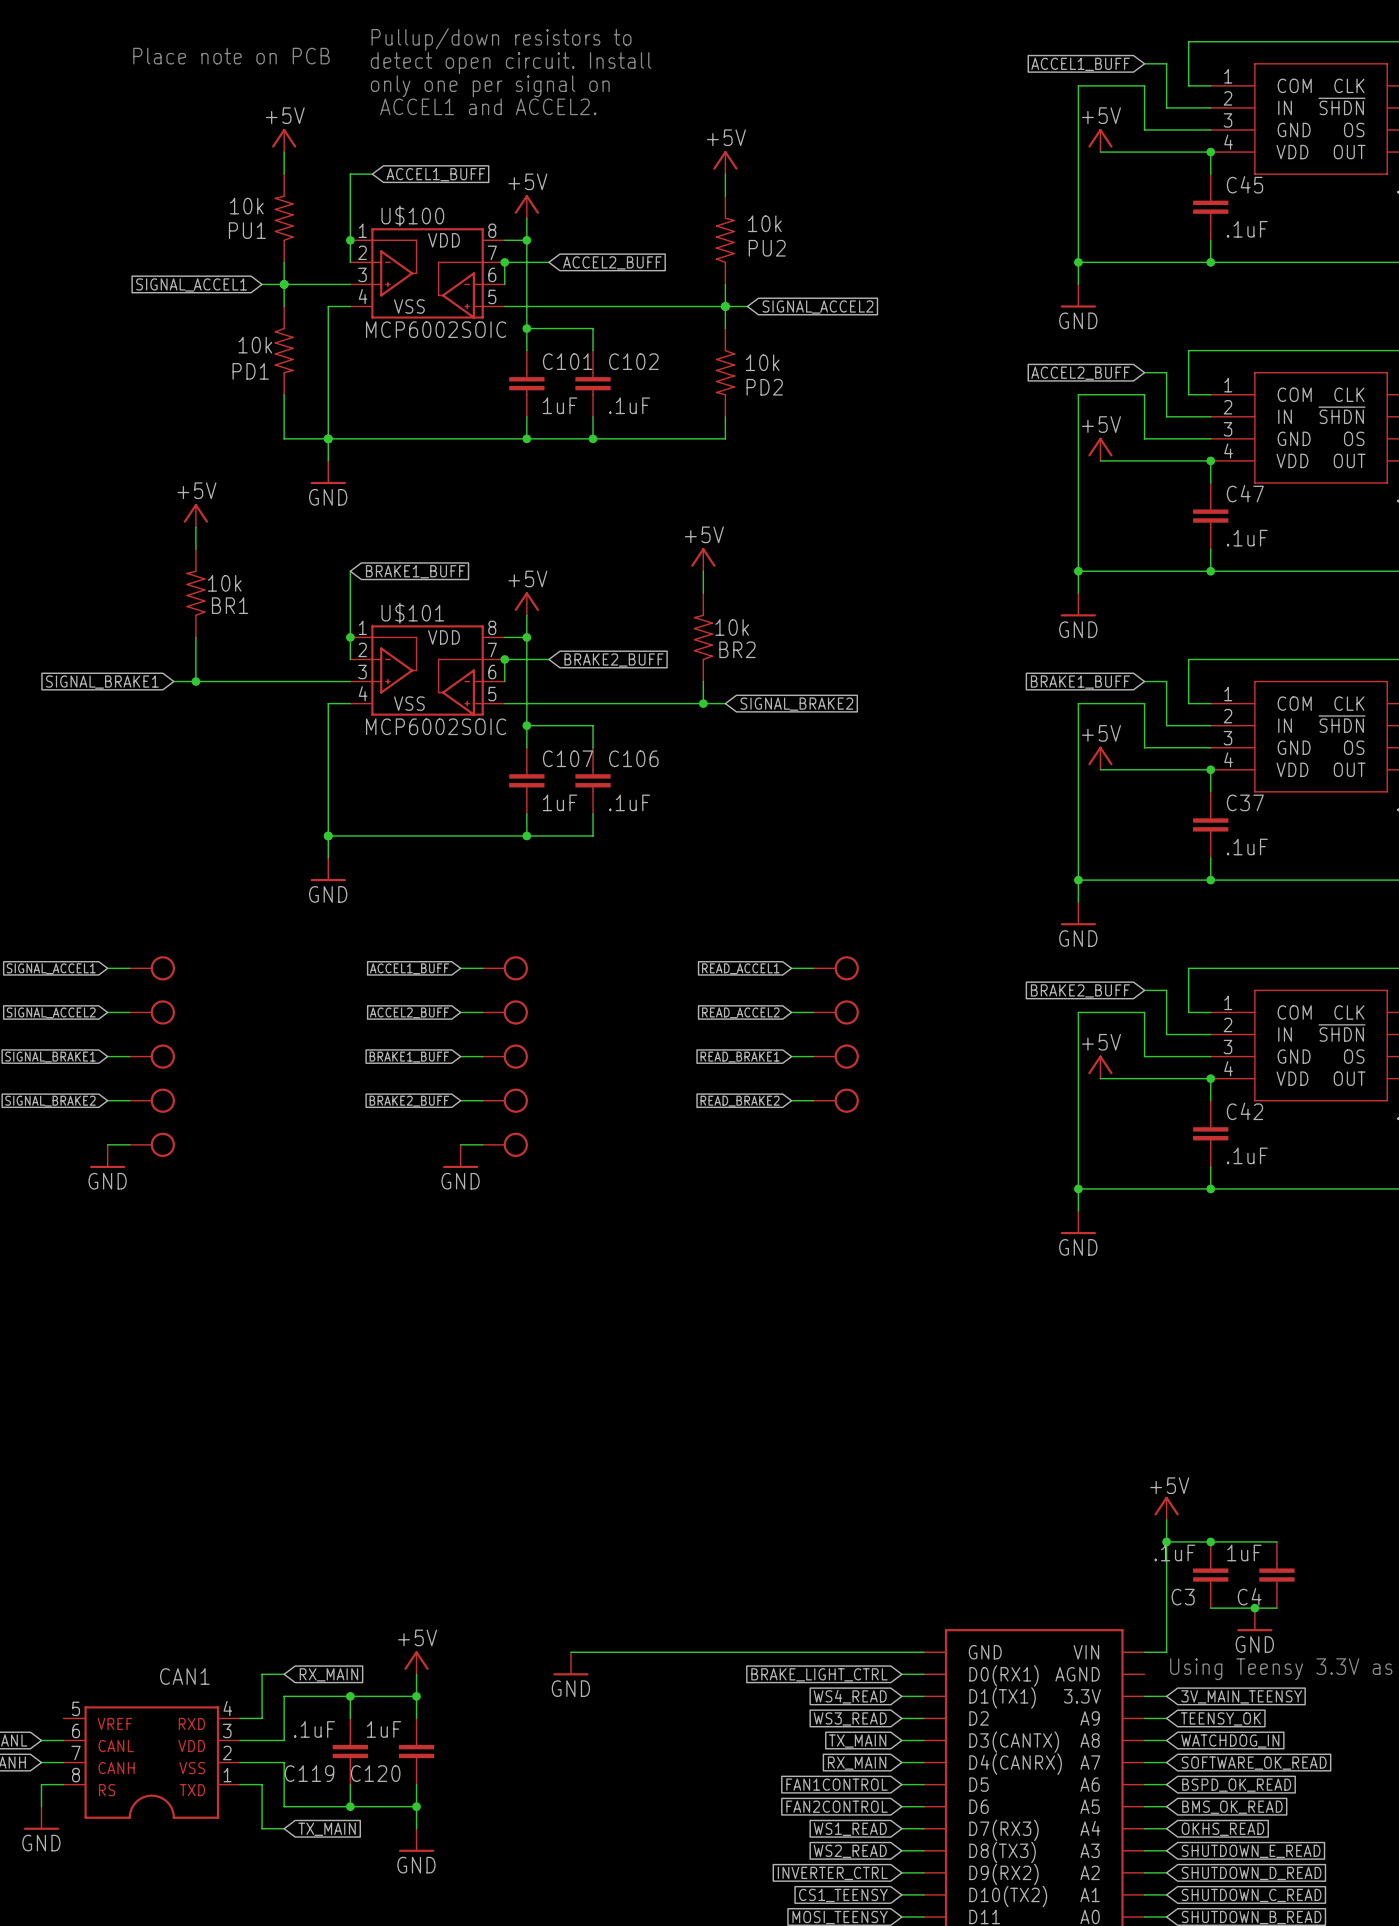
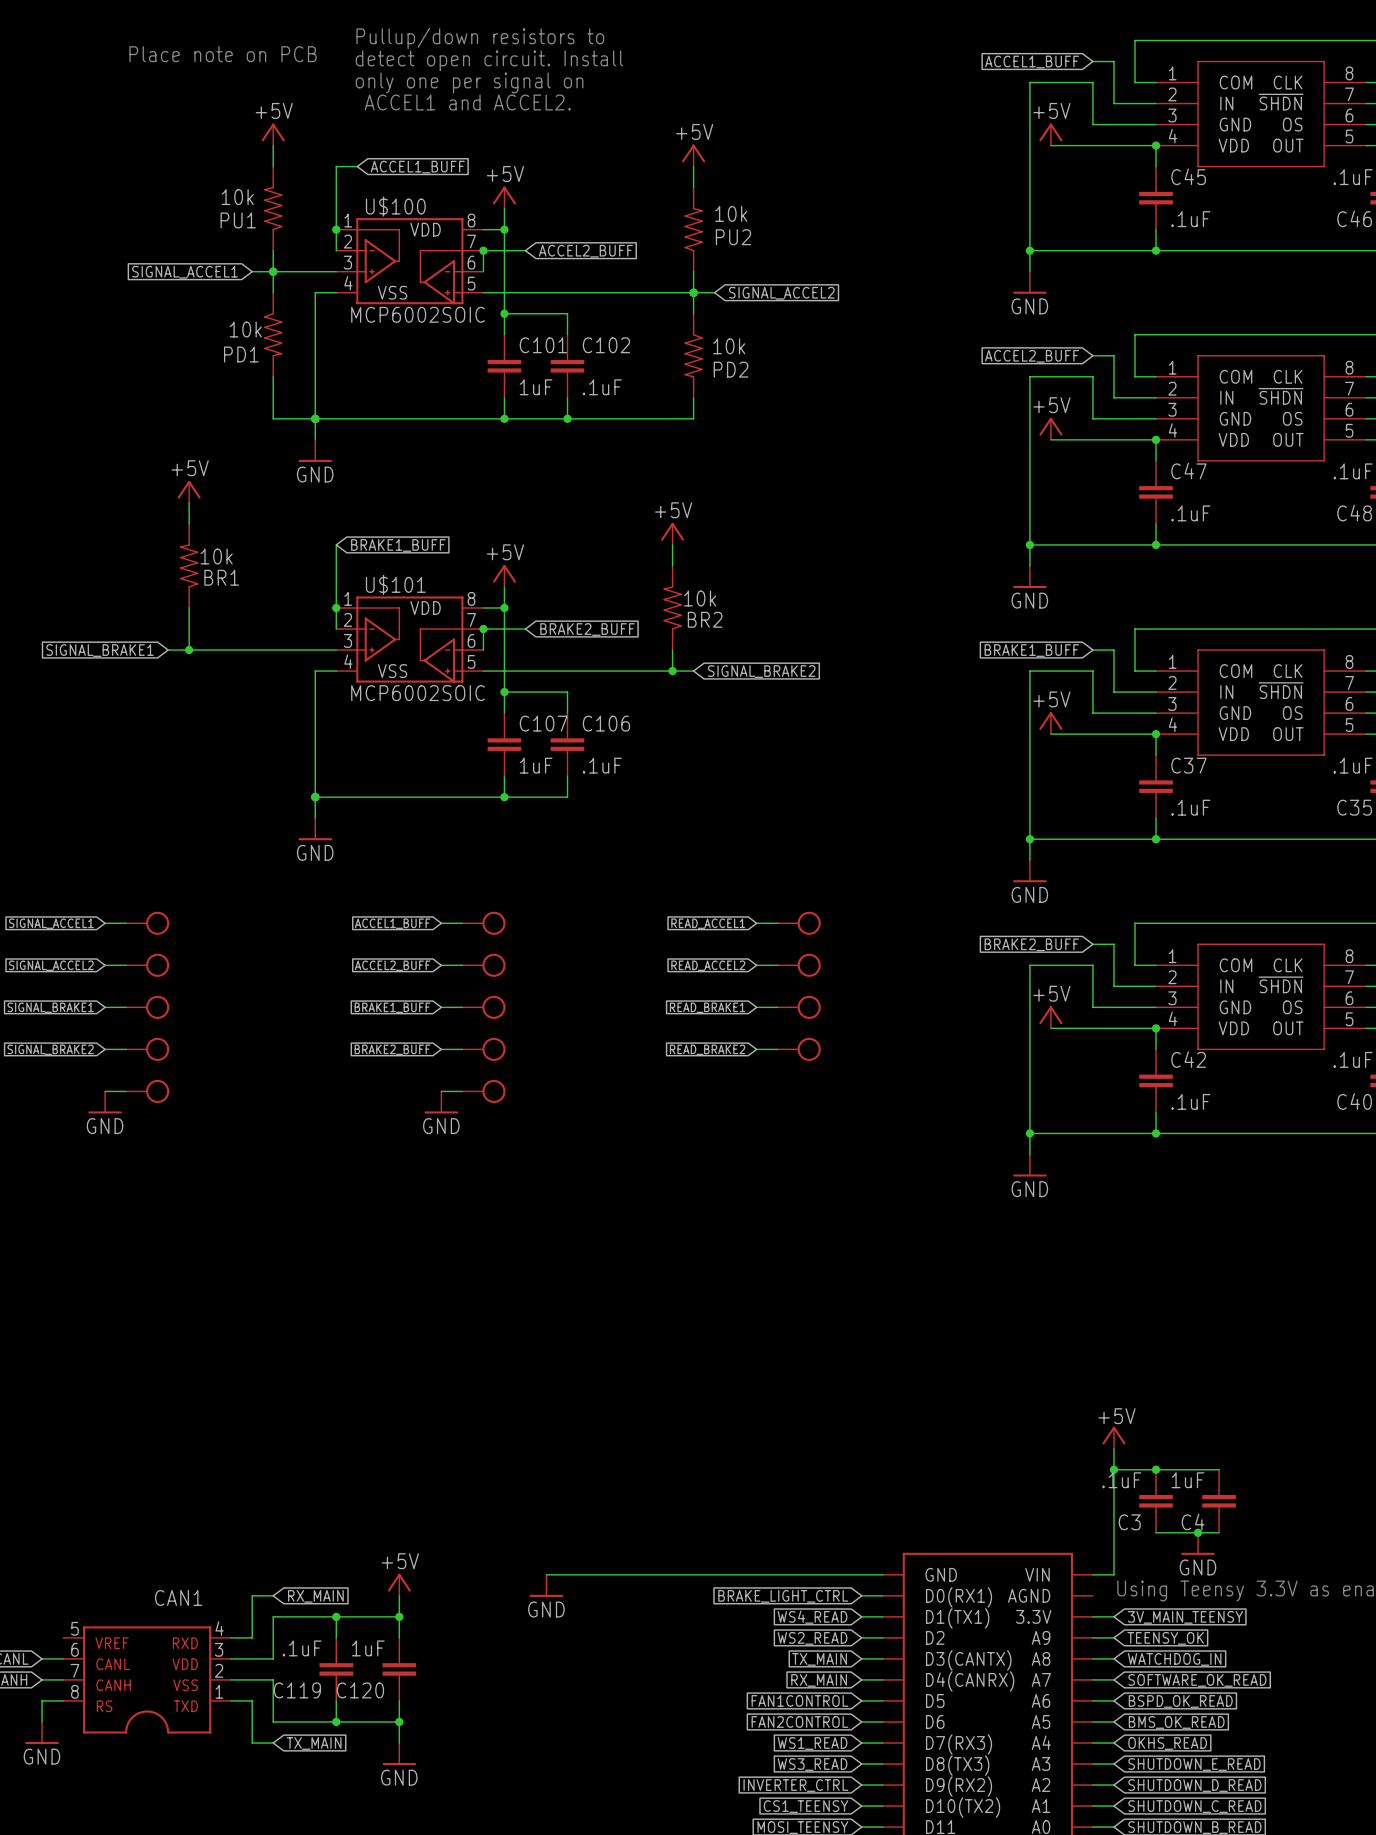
global label: WS3_READ (850, 1718) -> WS2_READ (812, 1638)
global label: WS2_READ (850, 1851) -> WS3_READ (812, 1764)

